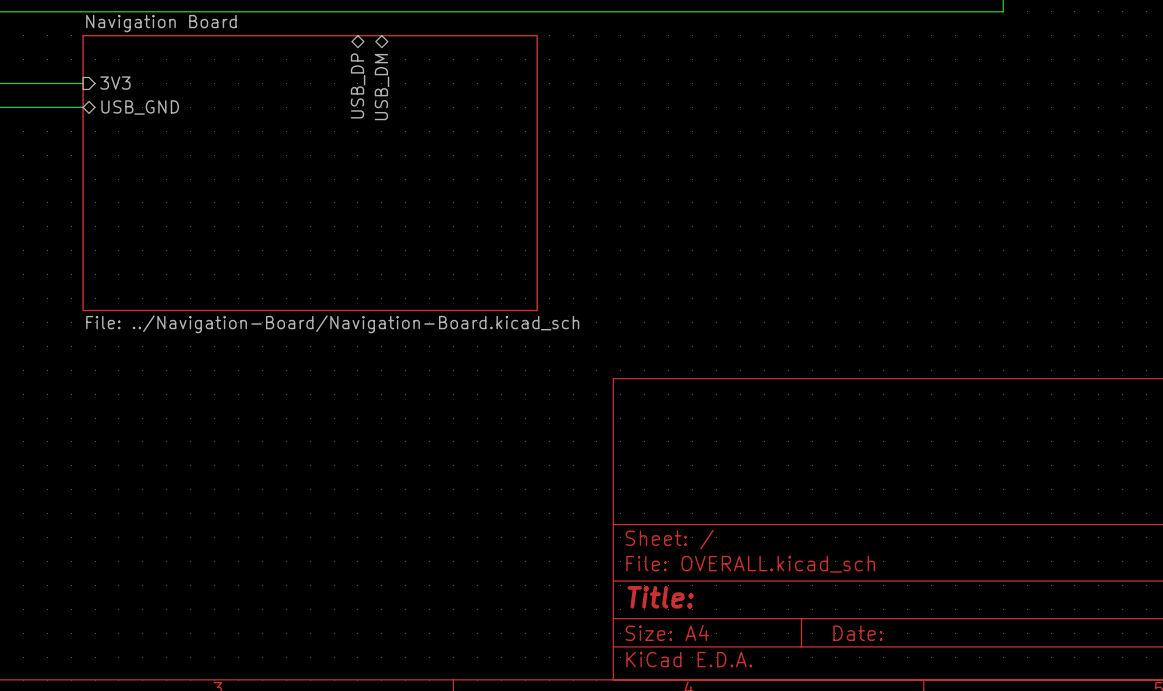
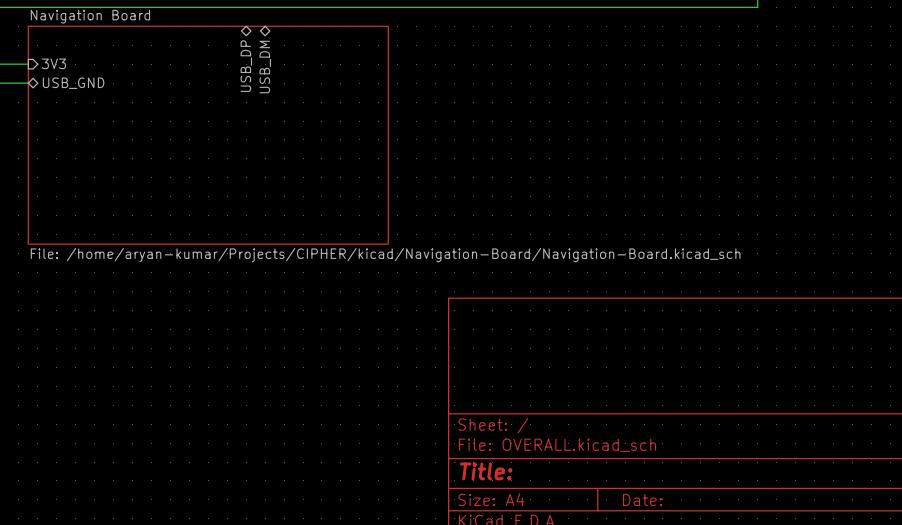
sheet Navigation Board value: File: ../Navigation-Board/Navigation-Board.kicad_sch (332, 324) -> File: /home/aryan-kumar/Projects/CIPHER/kicad/Navigation-Board/Navigation-Board.kicad_sch (385, 255)

